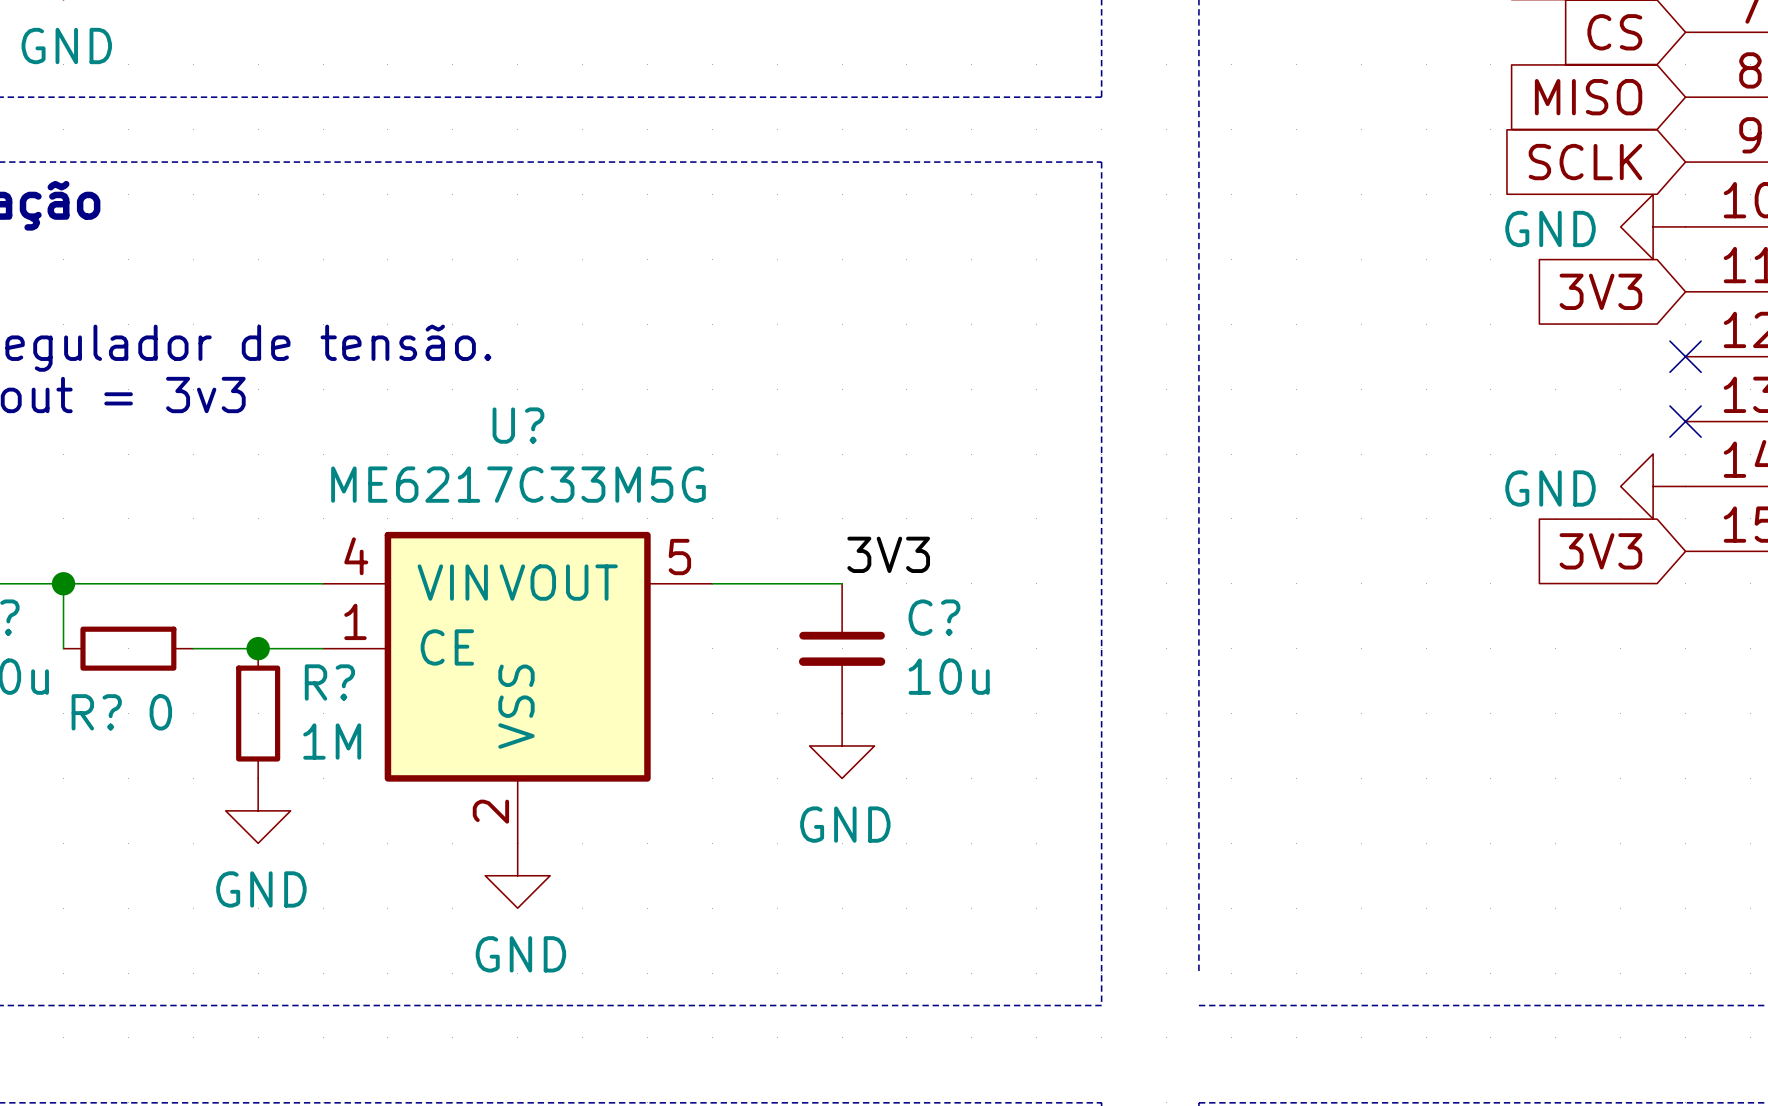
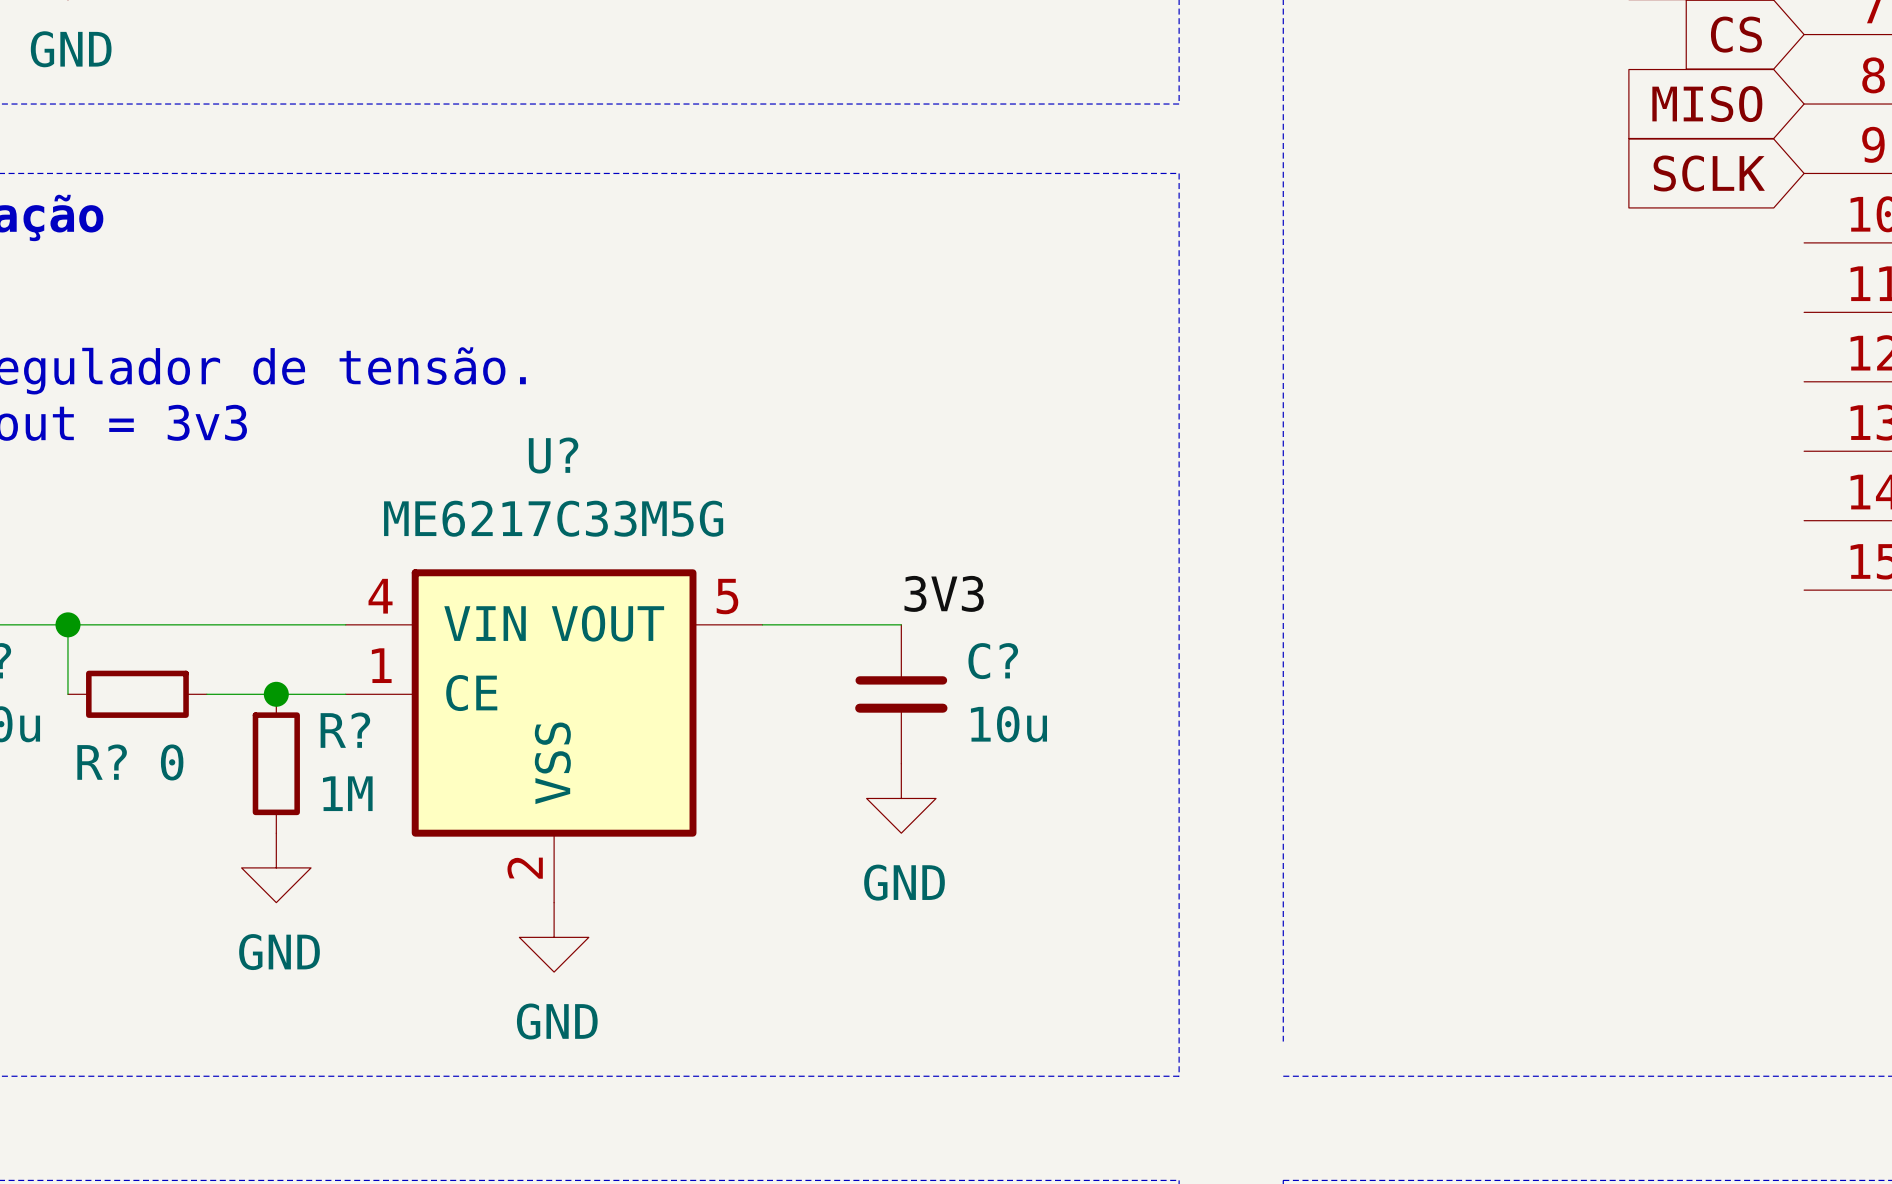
power symbol: GND (1653, 226) -> none
global label: 3V3 (1600, 291) -> none
no-connect mark: (1685, 356) -> none
no-connect mark: (1685, 421) -> none
power symbol: GND (1653, 486) -> none
global label: 3V3 (1600, 551) -> none

